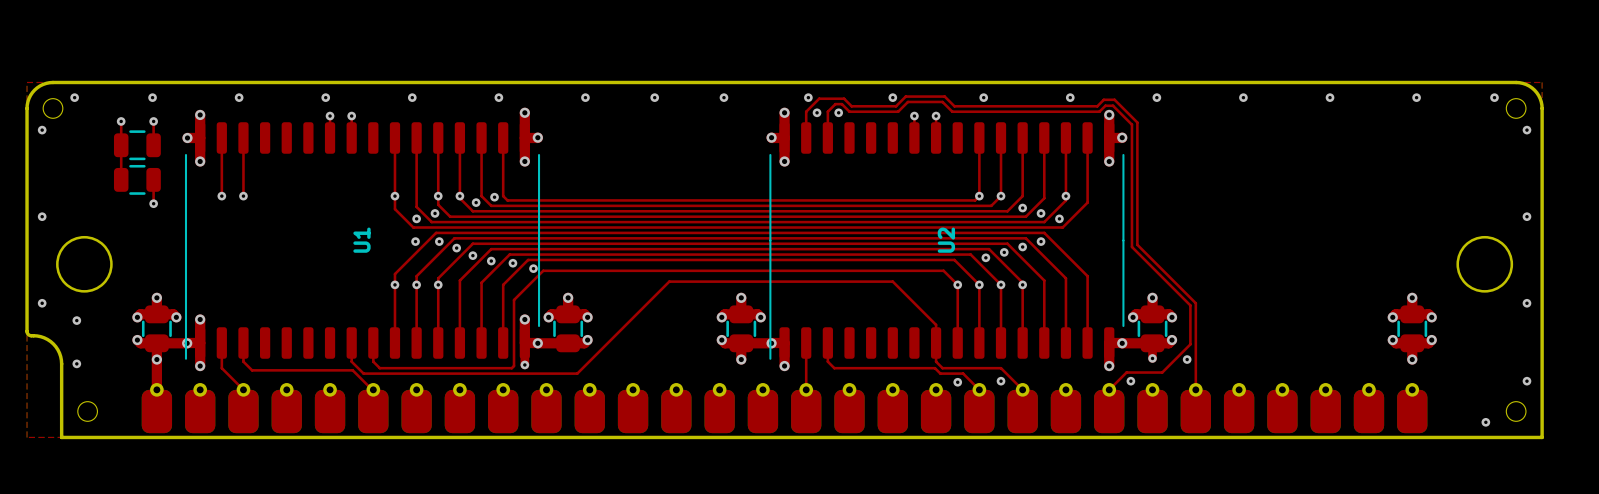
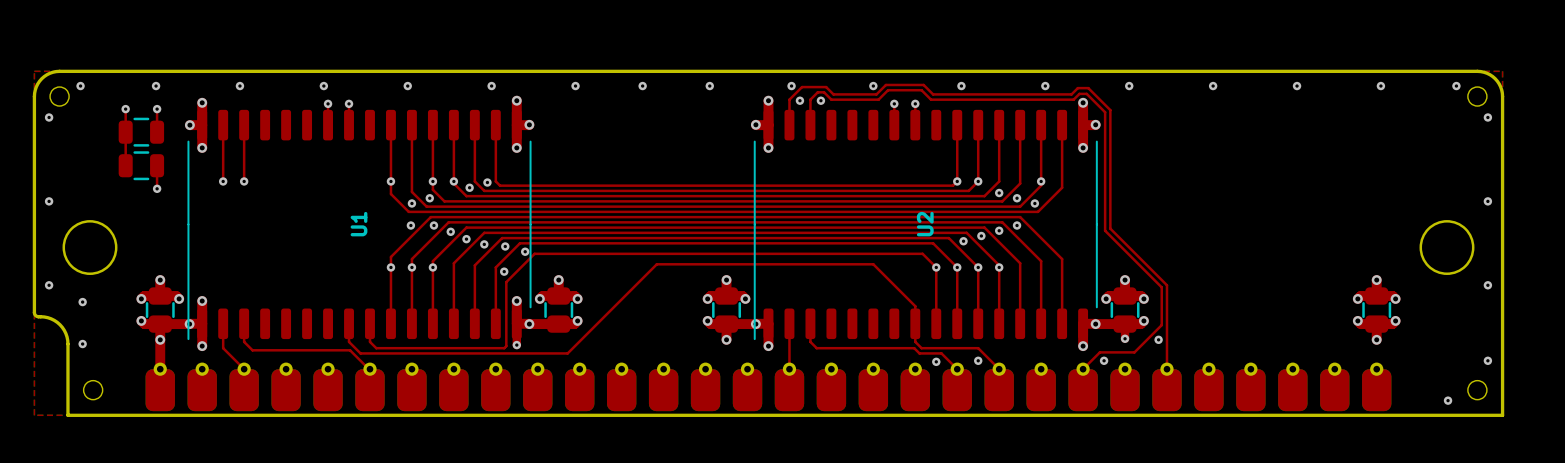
via: none -> (504, 271)

